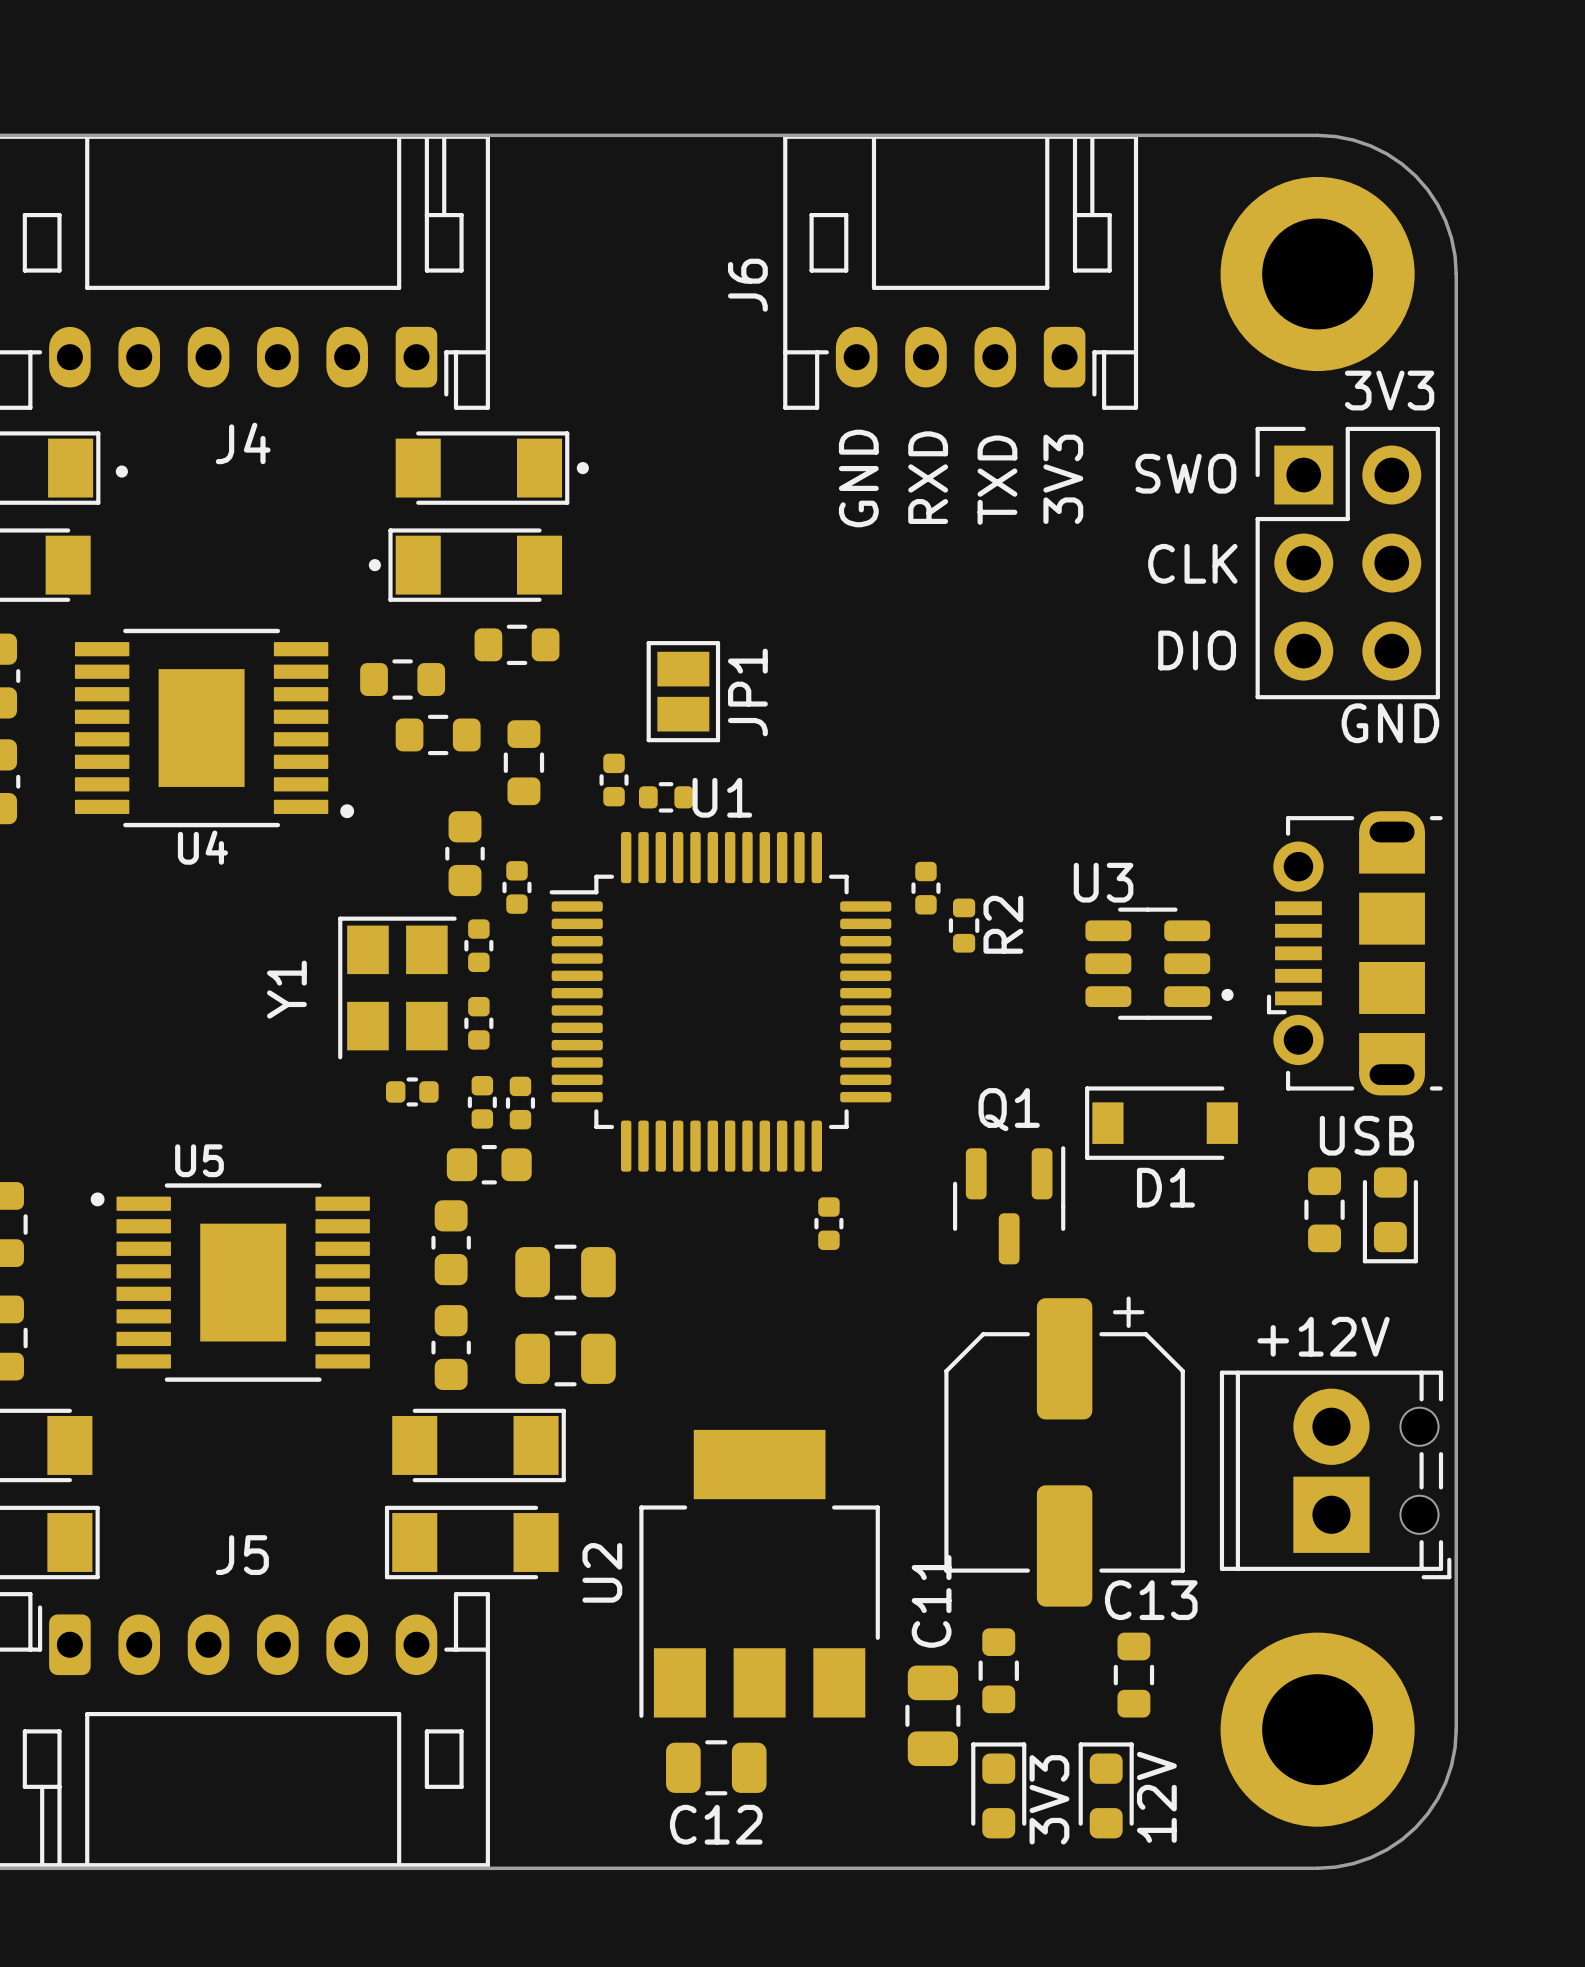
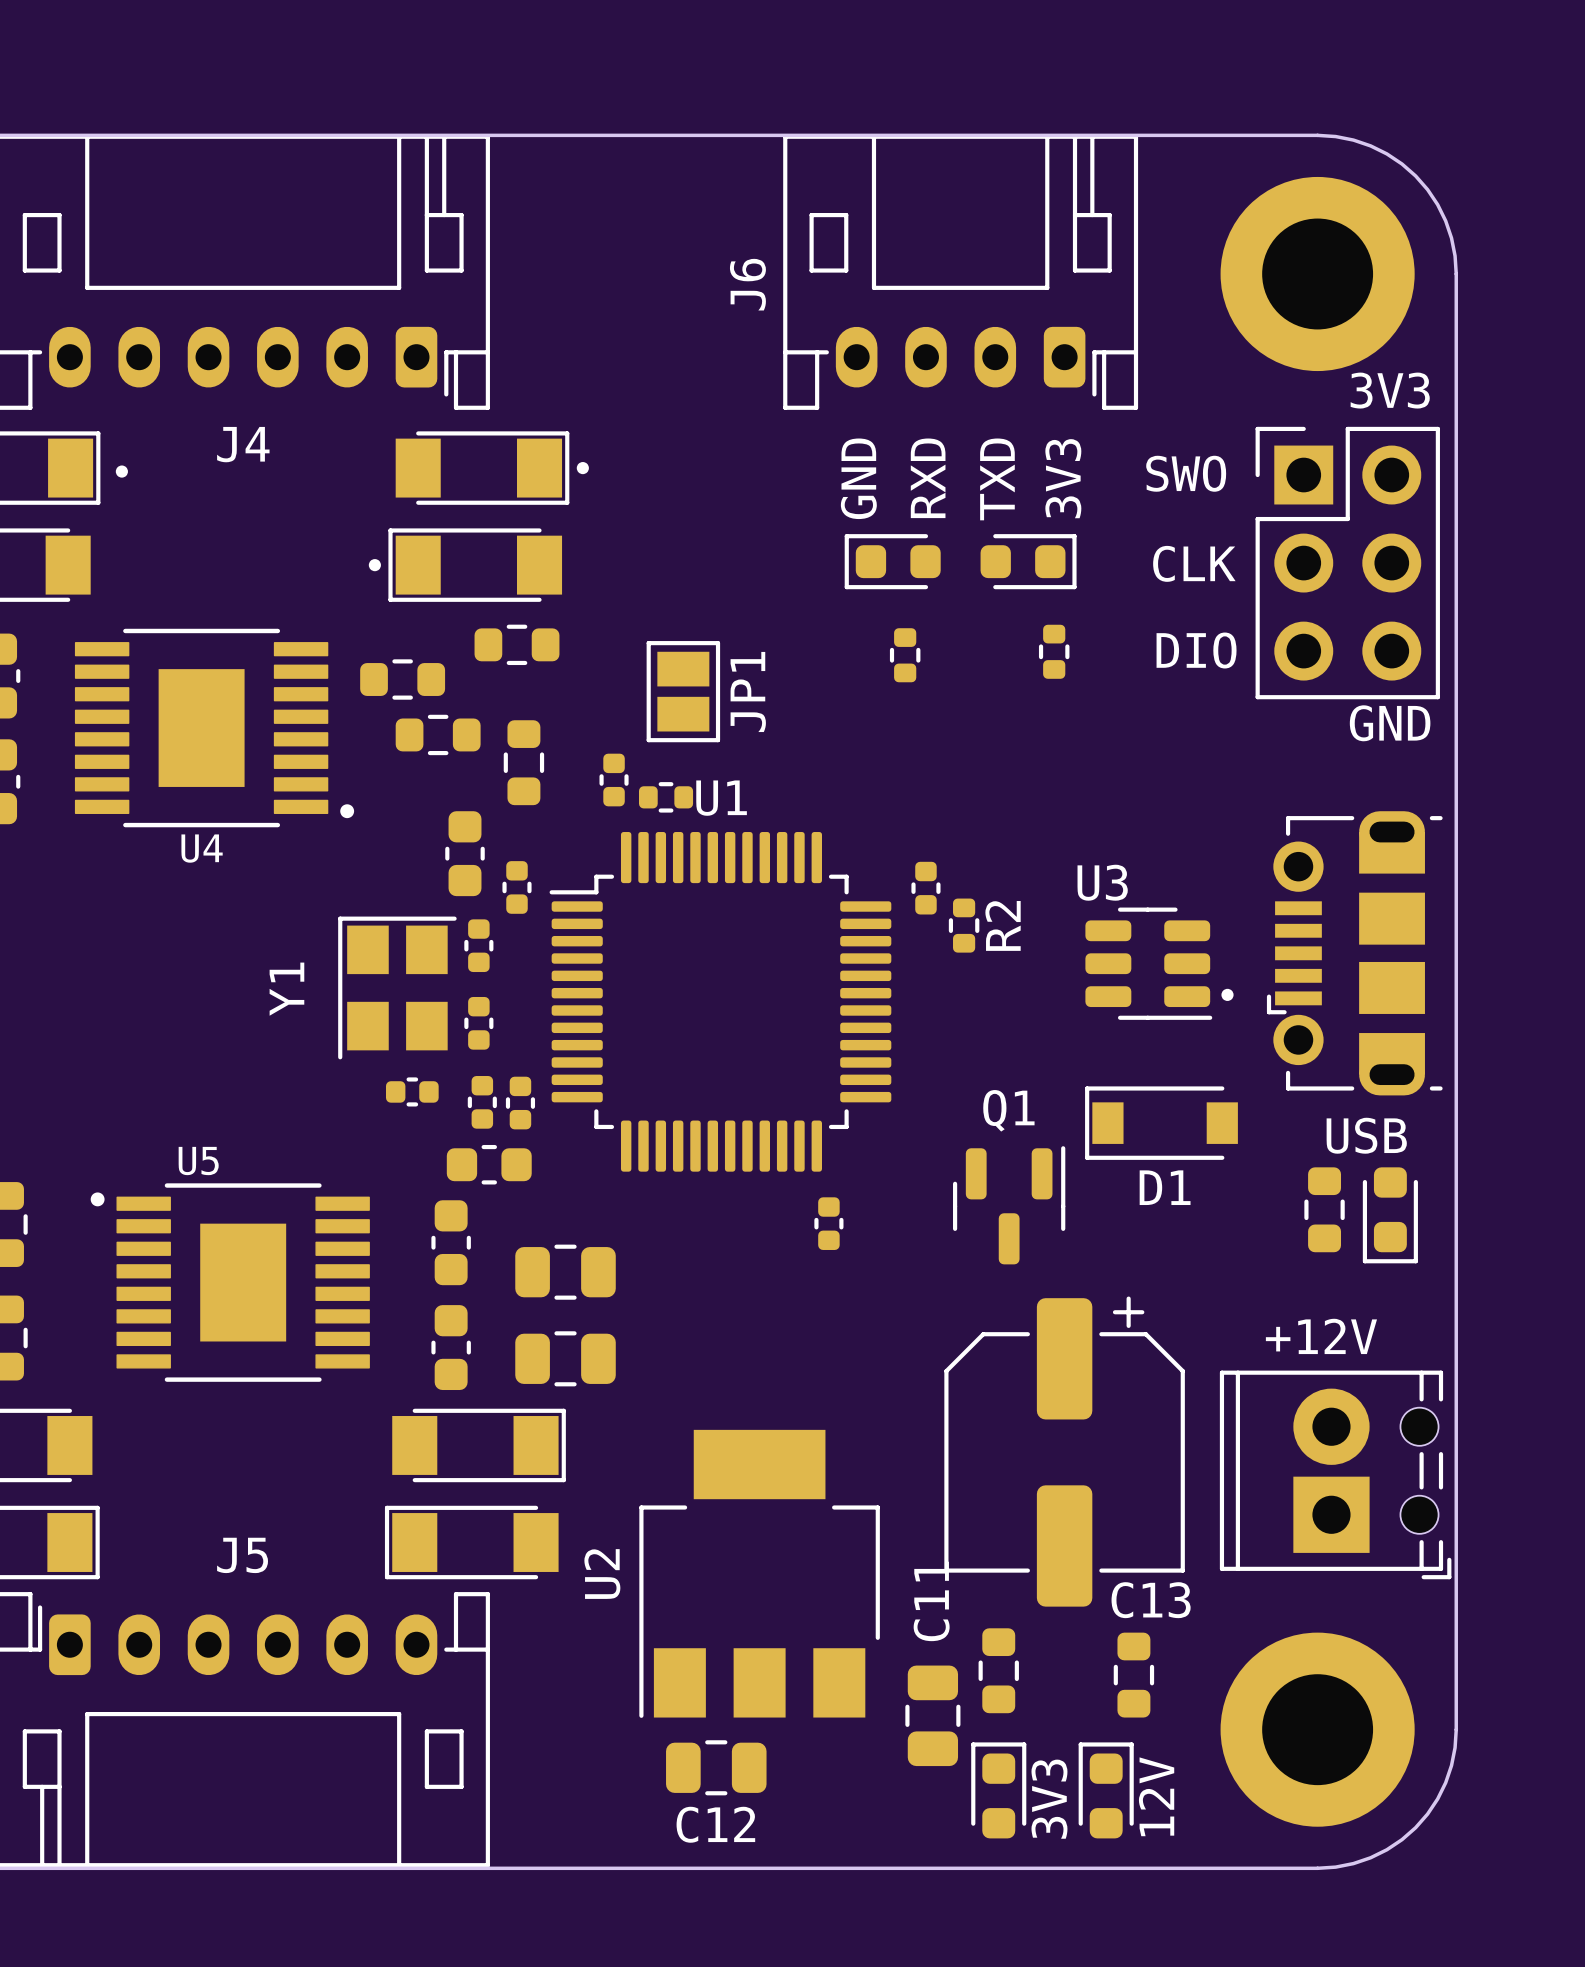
part: none -> (892, 561)
part: none -> (1028, 561)
part: none -> (1054, 651)
part: none -> (905, 655)

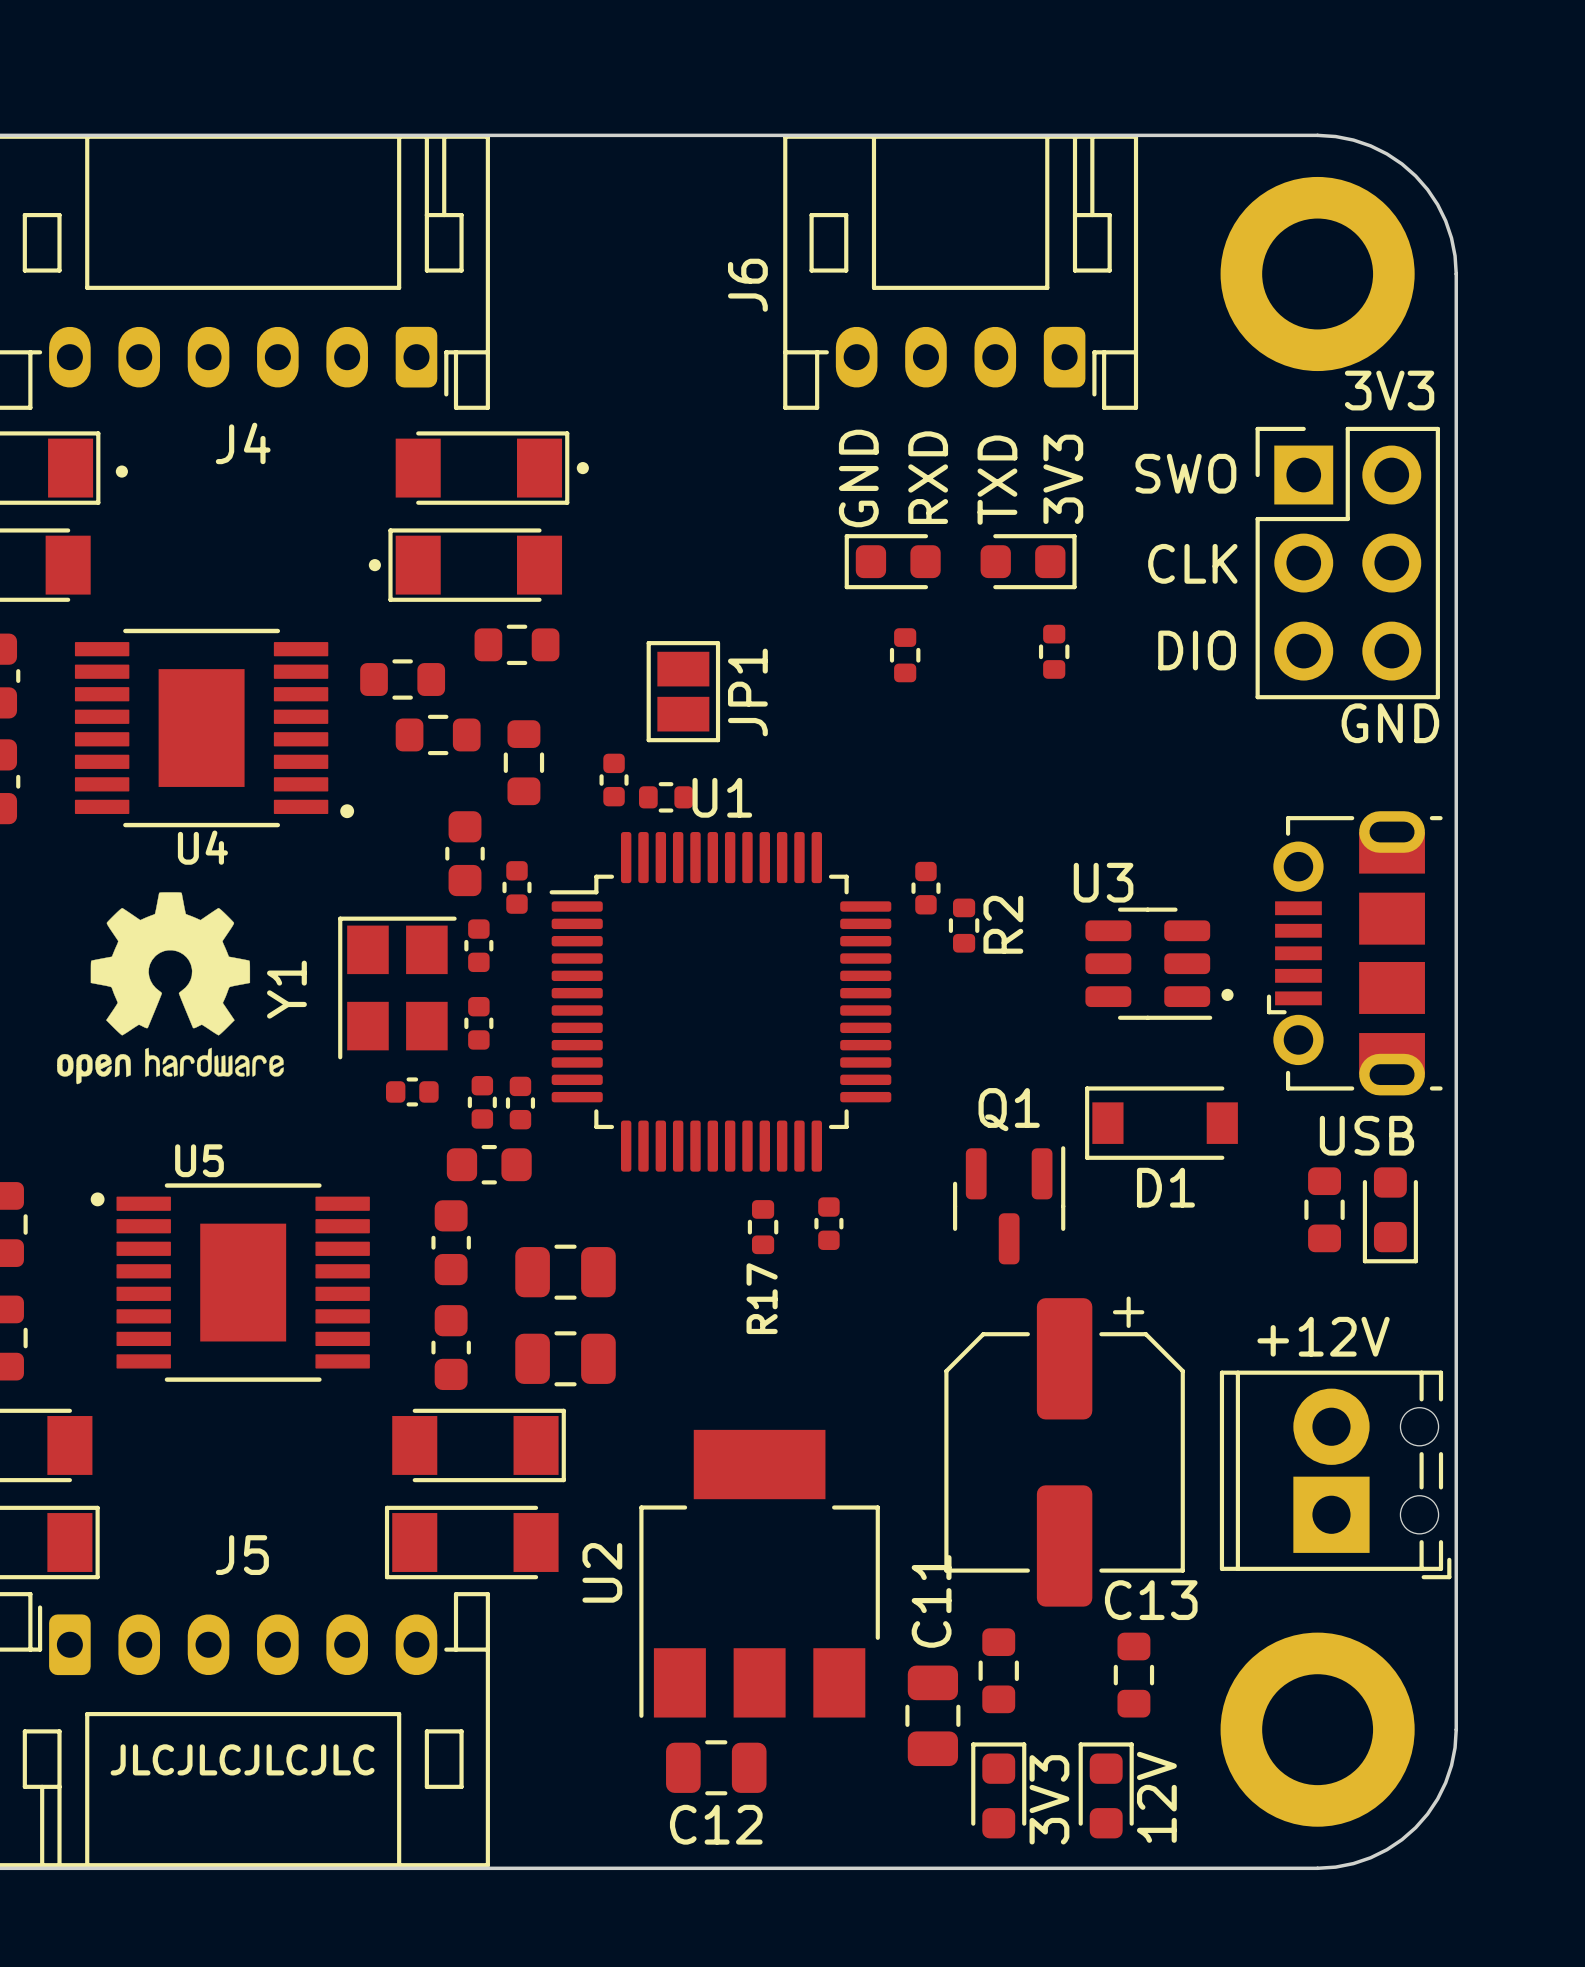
drawing: none -> [57, 892, 284, 1085]
R17: none -> (763, 1227)
text: none -> JLCJLCJLCJLC (242, 1759)

